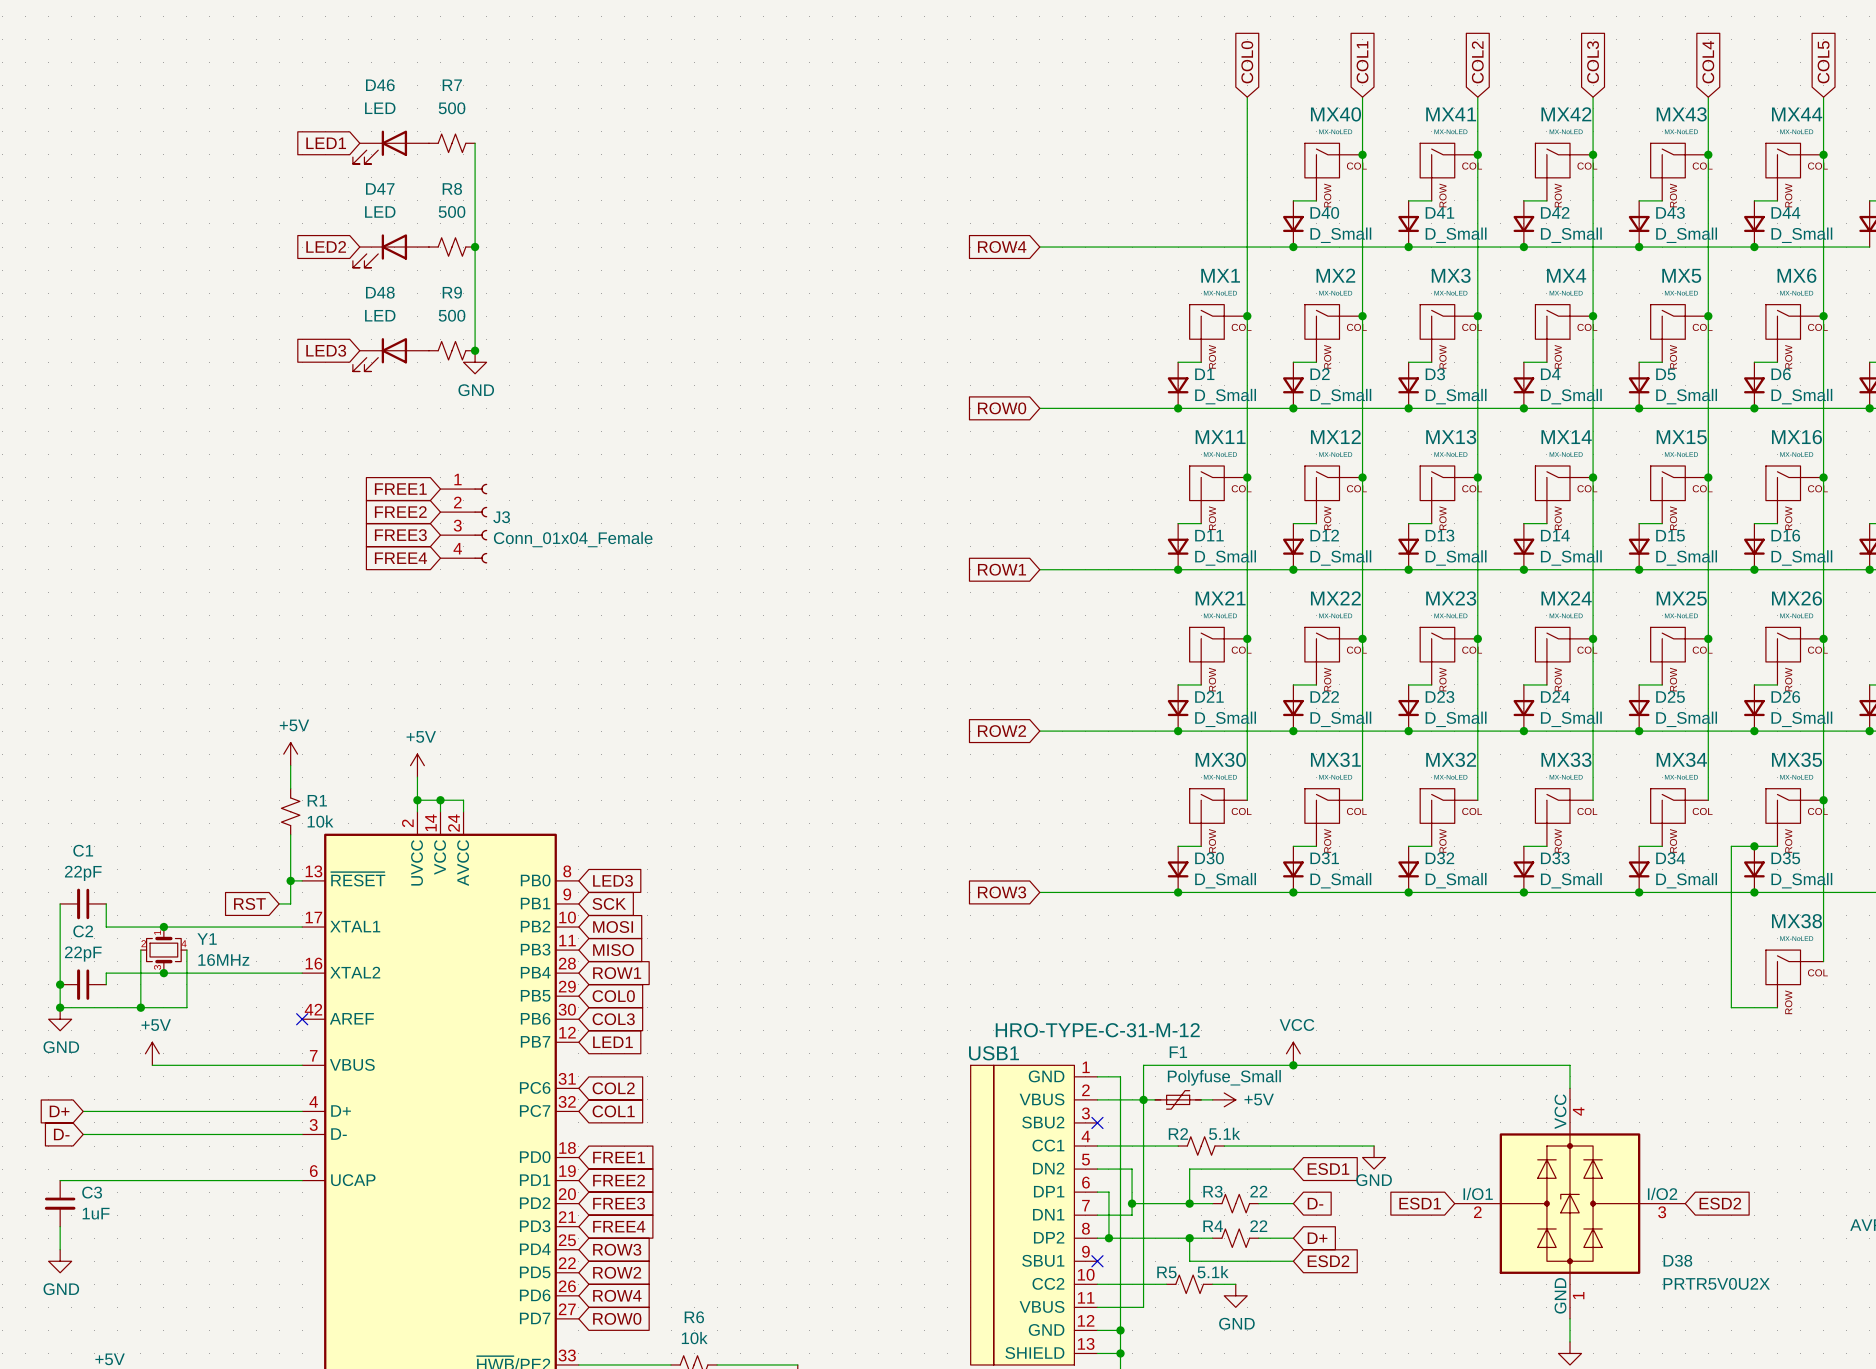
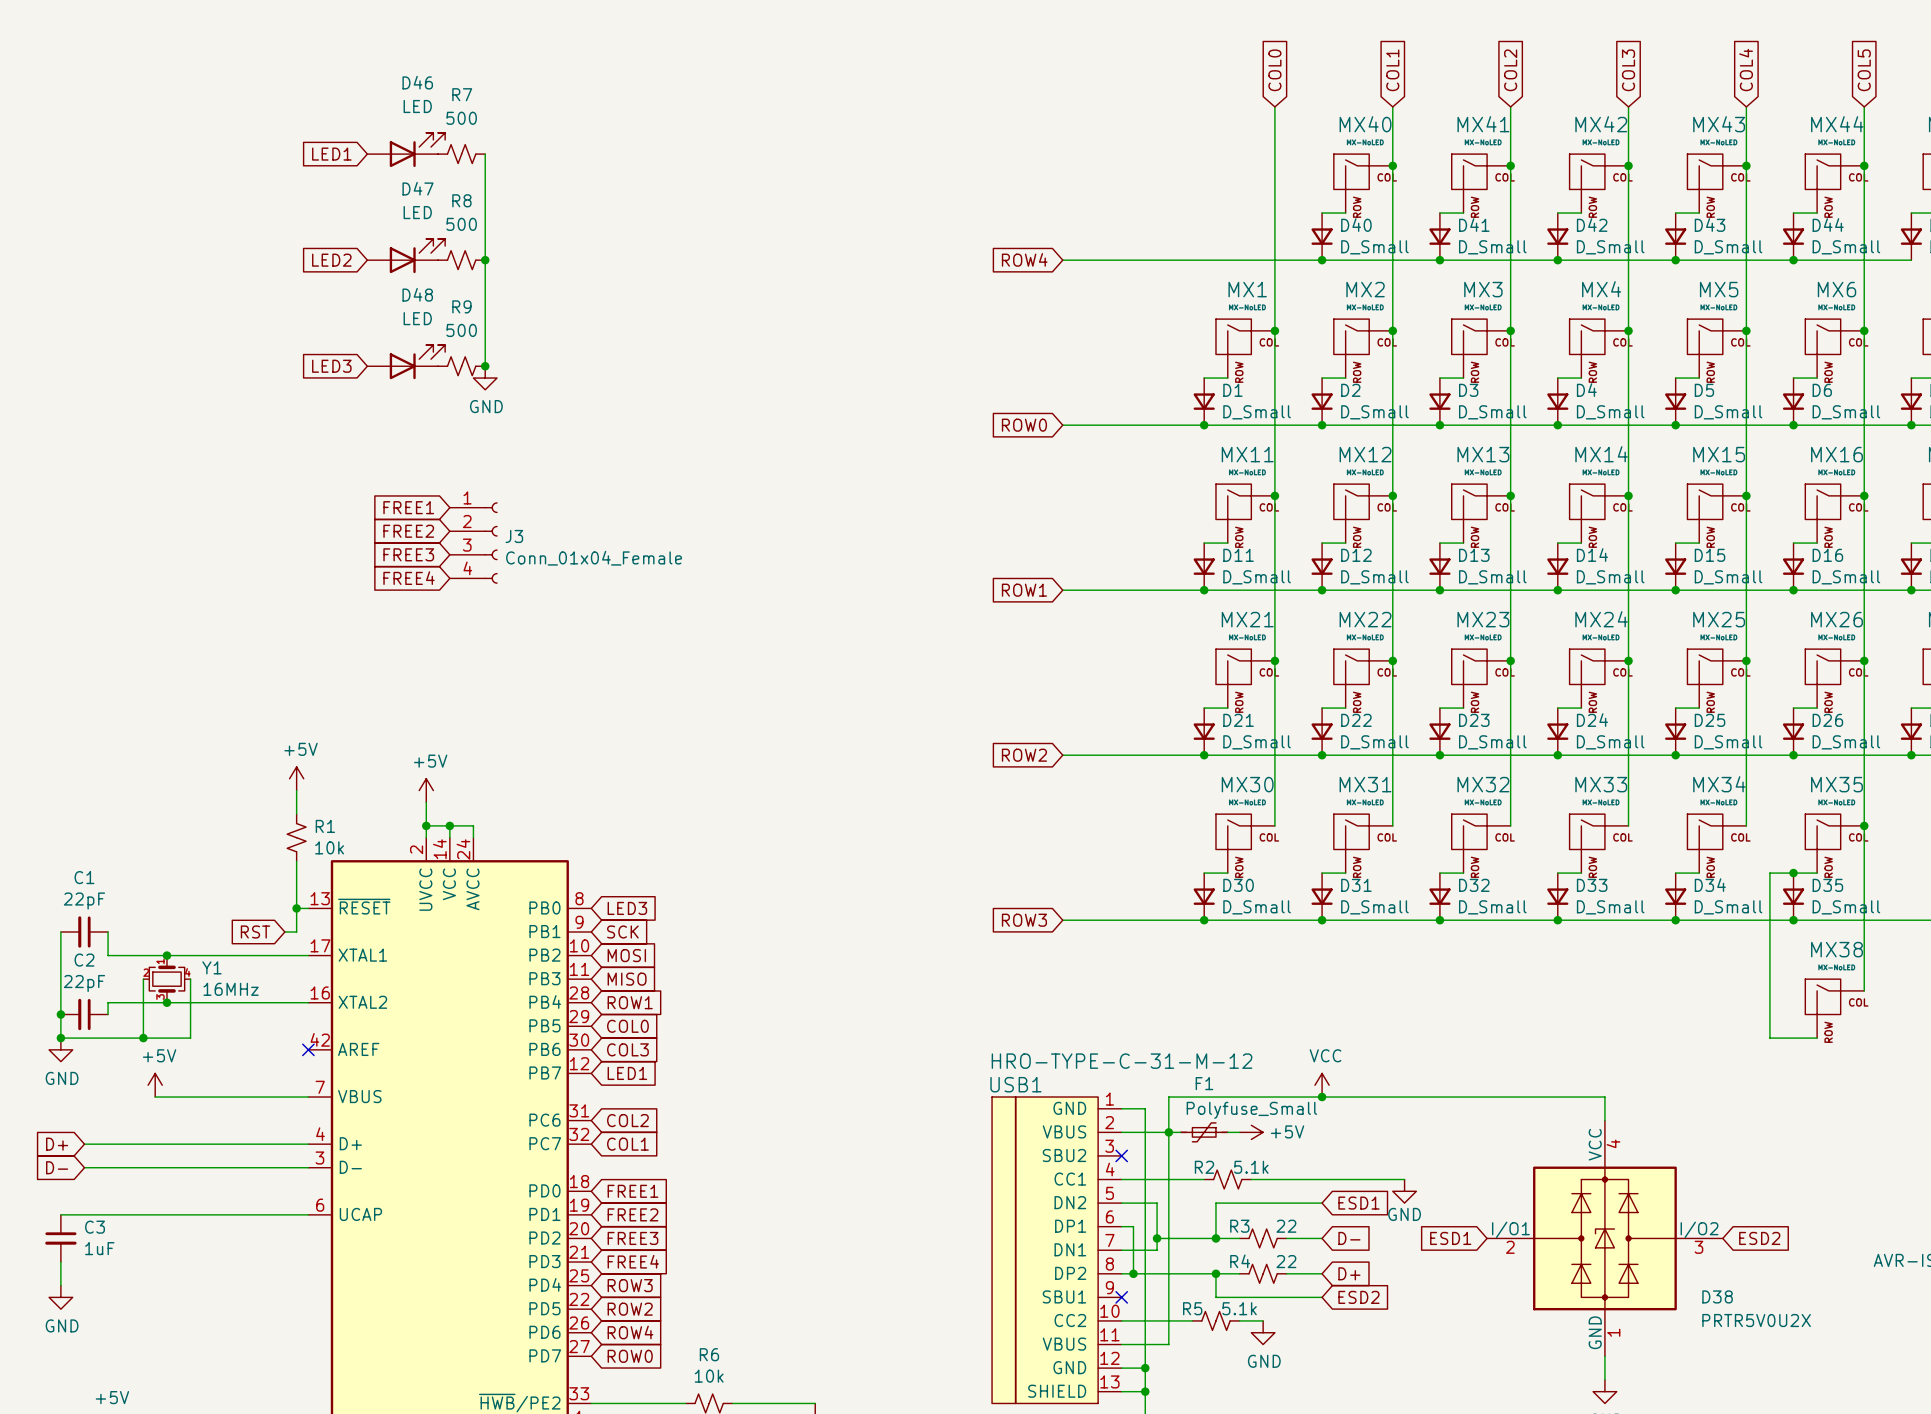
D46 name position: D46 (380, 85) -> D46 (417, 82)
D46 value position: LED (380, 108) -> LED (417, 106)
D46 rotation: 0° (379, 147) -> 180° (417, 149)
D47 name position: D47 (380, 188) -> D47 (418, 188)
D47 value position: LED (380, 212) -> LED (417, 212)
D47 rotation: 0° (379, 251) -> 180° (417, 256)
D48 name position: D48 (380, 292) -> D48 (417, 294)
D48 value position: LED (380, 315) -> LED (417, 318)
D48 rotation: 0° (379, 354) -> 180° (417, 362)

